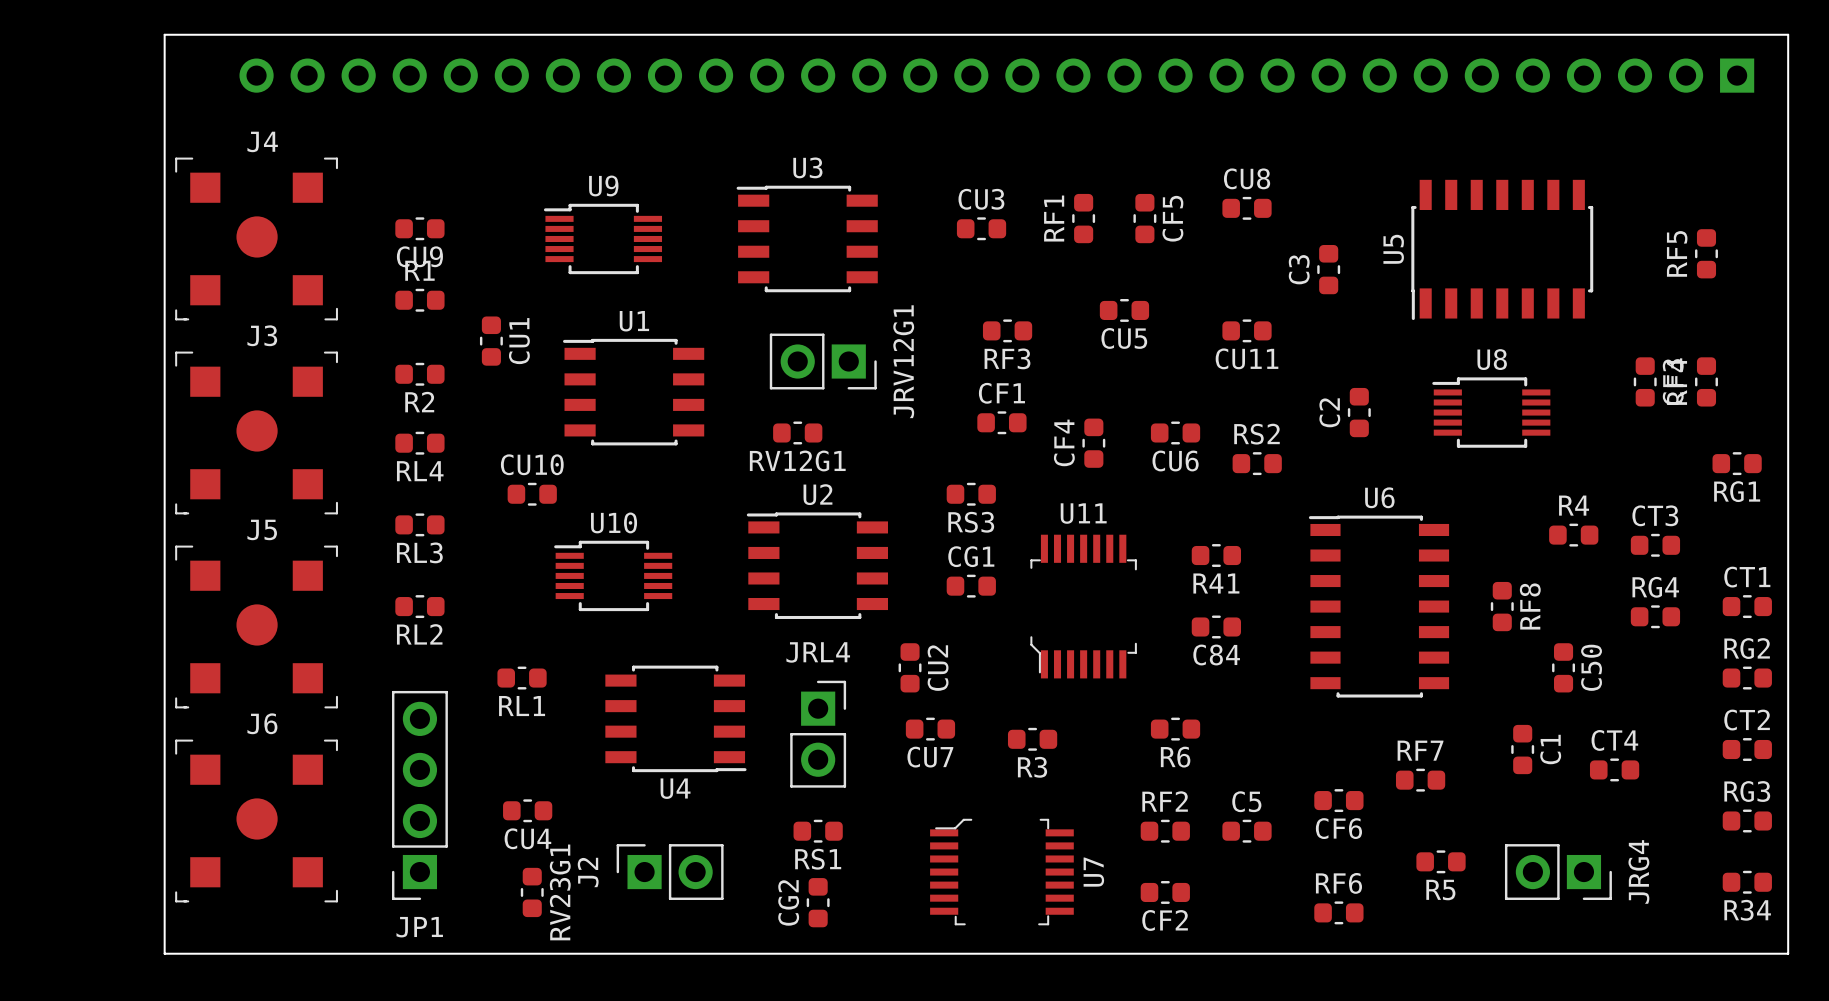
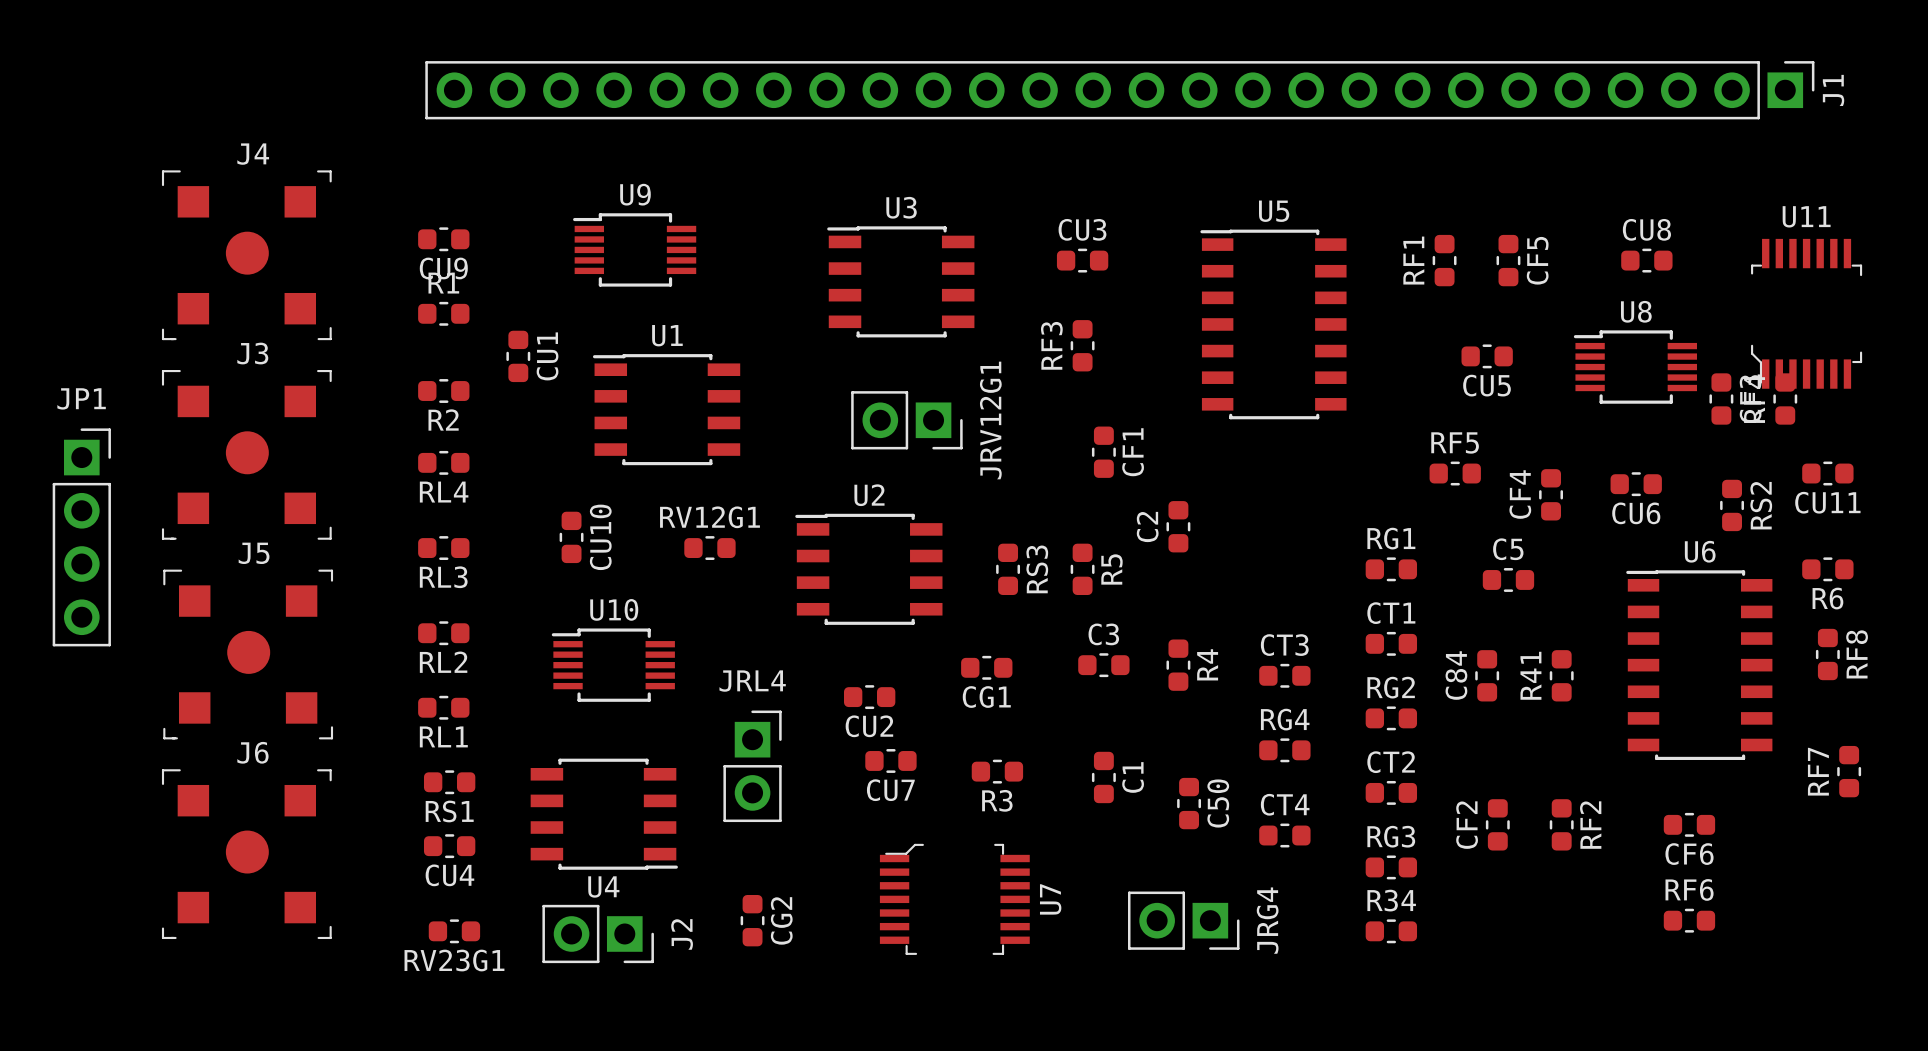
board edge: (164, 34) (164, 953) (1788, 953) (1788, 34) (164, 34) -> none
part: (996, 75) -> none
J1: none -> (1119, 90)
CU8 position: (1247, 208) -> (1646, 260)
RF1 position: (1083, 218) -> (1444, 260)
CF5 position: (1144, 218) -> (1508, 260)
CU3 position: (981, 228) -> (1082, 260)
J4 position: (256, 238) -> (246, 255)
U3 position: (807, 238) -> (900, 281)
U5 rotation: 0° (1502, 249) -> 90° clockwise (1273, 324)
U5 position: (1502, 249) -> (1273, 324)
RF5 rotation: 0° (1706, 253) -> 90° clockwise (1455, 473)
RF5 position: (1706, 253) -> (1455, 473)
C3 rotation: 0° (1328, 269) -> 90° clockwise (1103, 665)
C3 position: (1328, 269) -> (1103, 665)
CU5 position: (1124, 310) -> (1487, 356)
RF3 rotation: 0° (1007, 330) -> 90° clockwise (1082, 345)
CU11 position: (1247, 330) -> (1827, 473)
JRV12G1 position: (823, 361) -> (906, 420)
C2 position: (1359, 412) -> (1178, 526)
U8 position: (1491, 412) -> (1635, 367)
CF1 rotation: 0° (1001, 422) -> 90° clockwise (1103, 452)
CF1 position: (1001, 422) -> (1103, 452)
J3 position: (256, 432) -> (246, 454)
RV12G1 position: (797, 432) -> (709, 548)
CU6 position: (1175, 432) -> (1636, 484)
CF4 position: (1093, 443) -> (1551, 494)
RV12G1 name position: RV12G1 (797, 460) -> RV12G1 (709, 517)
RS2 rotation: 0° (1257, 463) -> 90° clockwise (1732, 505)
RS2 position: (1257, 463) -> (1732, 505)
RG1 position: (1737, 463) -> (1391, 569)
RG1 name position: RG1 (1737, 491) -> RG1 (1391, 538)
CU10 rotation: 0° (532, 494) -> 90° clockwise (571, 537)
RS3 rotation: 0° (971, 494) -> 90° clockwise (1008, 569)
RS3 position: (971, 494) -> (1008, 569)
RS3 name position: RS3 (971, 522) -> RS3 (1037, 569)
R4 rotation: 0° (1573, 535) -> 90° clockwise (1178, 665)
R4 position: (1573, 535) -> (1178, 665)
CT3 position: (1655, 545) -> (1284, 675)
R41 rotation: 0° (1216, 555) -> 90° clockwise (1561, 675)
R41 position: (1216, 555) -> (1561, 675)
CG1 name position: CG1 (971, 556) -> CG1 (986, 697)
U2 position: (817, 565) -> (868, 569)
U10 position: (613, 575) -> (613, 665)
CG1 position: (971, 586) -> (986, 667)
U11 position: (1083, 606) -> (1806, 313)
U6 position: (1378, 606) -> (1699, 665)
RF8 position: (1502, 606) -> (1827, 654)
CT1 position: (1747, 606) -> (1391, 643)
RG4 position: (1655, 616) -> (1284, 750)
J5 position: (256, 626) -> (248, 654)
C84 rotation: 0° (1216, 626) -> 90° clockwise (1487, 675)
C84 position: (1216, 626) -> (1487, 675)
CU2 rotation: 0° (910, 667) -> 90° clockwise (869, 697)
CU2 position: (910, 667) -> (869, 697)
C50 position: (1563, 667) -> (1189, 803)
RL1 position: (522, 678) -> (443, 707)
RG2 position: (1747, 678) -> (1391, 718)
U4 position: (675, 718) -> (604, 814)
CU7 position: (930, 729) -> (890, 760)
R6 position: (1175, 729) -> (1827, 569)
JRL4 position: (818, 734) -> (752, 766)
R3 position: (1032, 739) -> (997, 771)
C1 position: (1522, 749) -> (1103, 777)
CT2 position: (1747, 749) -> (1391, 792)
RF7 name position: RF7 (1420, 750) -> RF7 (1818, 771)
CT4 position: (1614, 769) -> (1284, 835)
RF7 rotation: 0° (1420, 780) -> 90° clockwise (1849, 771)
RF7 position: (1420, 780) -> (1849, 771)
JP1 rotation: 0° (419, 795) -> 180° (81, 537)
JP1 position: (419, 795) -> (81, 537)
CF6 position: (1338, 800) -> (1689, 824)
CU4 position: (527, 810) -> (449, 846)
J6 position: (256, 820) -> (246, 854)
RG3 position: (1747, 820) -> (1391, 867)
RS1 position: (818, 831) -> (449, 782)
RF2 rotation: 0° (1165, 831) -> 90° clockwise (1561, 824)
RF2 position: (1165, 831) -> (1561, 824)
C5 position: (1247, 831) -> (1508, 579)
R5 rotation: 0° (1441, 861) -> 90° clockwise (1082, 569)
R5 position: (1441, 861) -> (1082, 569)
J2 rotation: 0° (670, 872) -> 180° (598, 933)
J2 position: (670, 872) -> (598, 933)
U7 position: (1001, 872) -> (954, 899)
JRG4 position: (1558, 872) -> (1183, 920)
R34 position: (1747, 882) -> (1391, 931)
R5 name position: R5 (1440, 890) -> R5 (1111, 569)
RV23G1 rotation: 0° (532, 892) -> 90° clockwise (454, 931)
RV23G1 position: (532, 892) -> (454, 931)
CF2 rotation: 0° (1165, 892) -> 90° clockwise (1497, 824)
CF2 position: (1165, 892) -> (1497, 824)
CG2 name position: CG2 (788, 902) -> CG2 (781, 920)
CG2 position: (818, 902) -> (752, 920)
R34 name position: R34 (1747, 910) -> R34 (1391, 900)
RF6 position: (1338, 912) -> (1689, 920)

